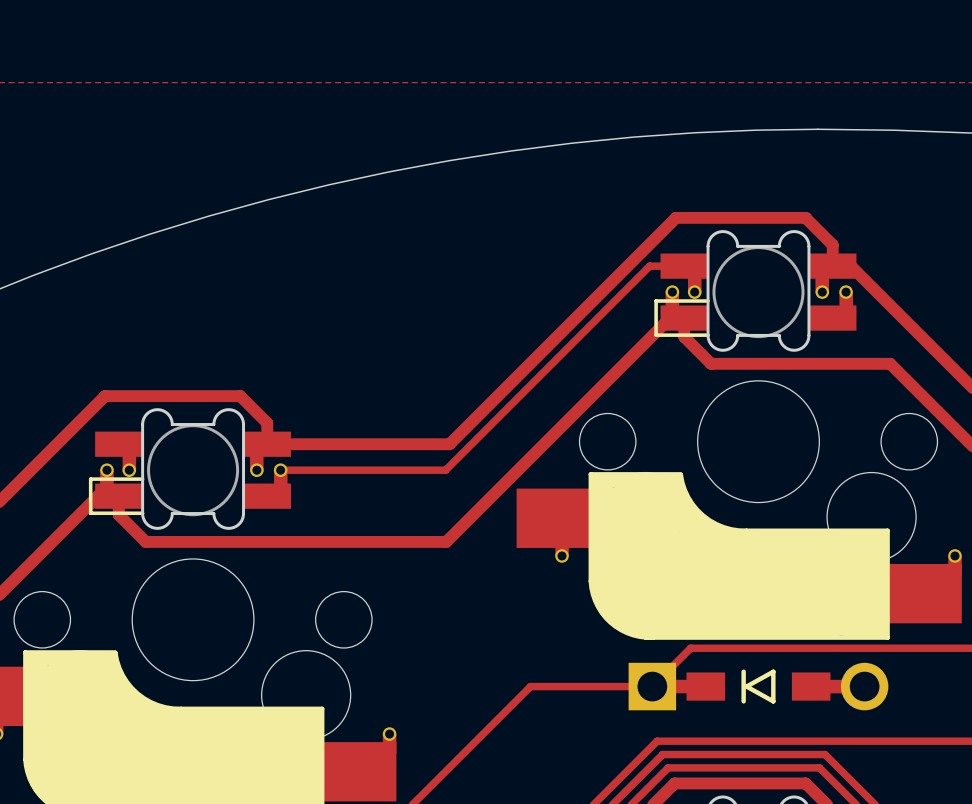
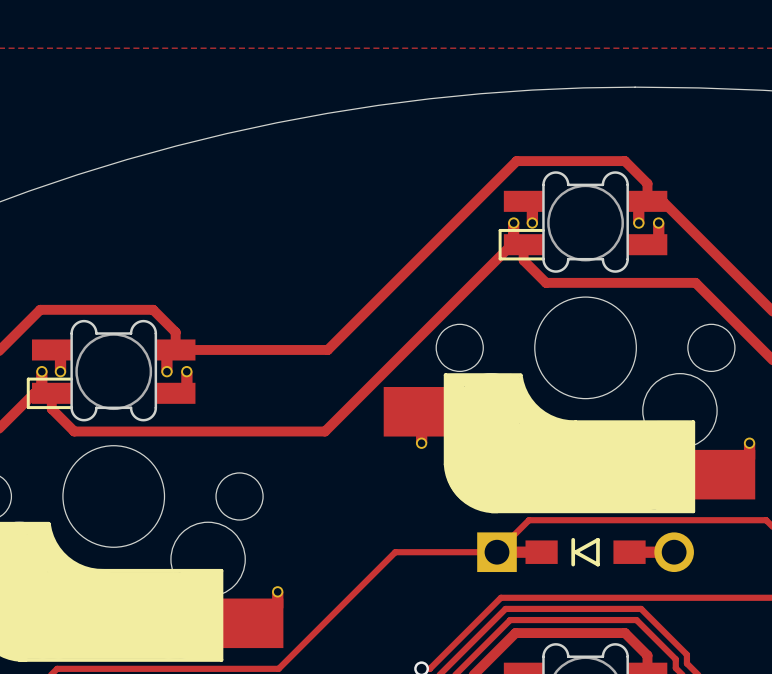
track: (684, 266) (649, 266) (445, 470) (280, 470) -> none

